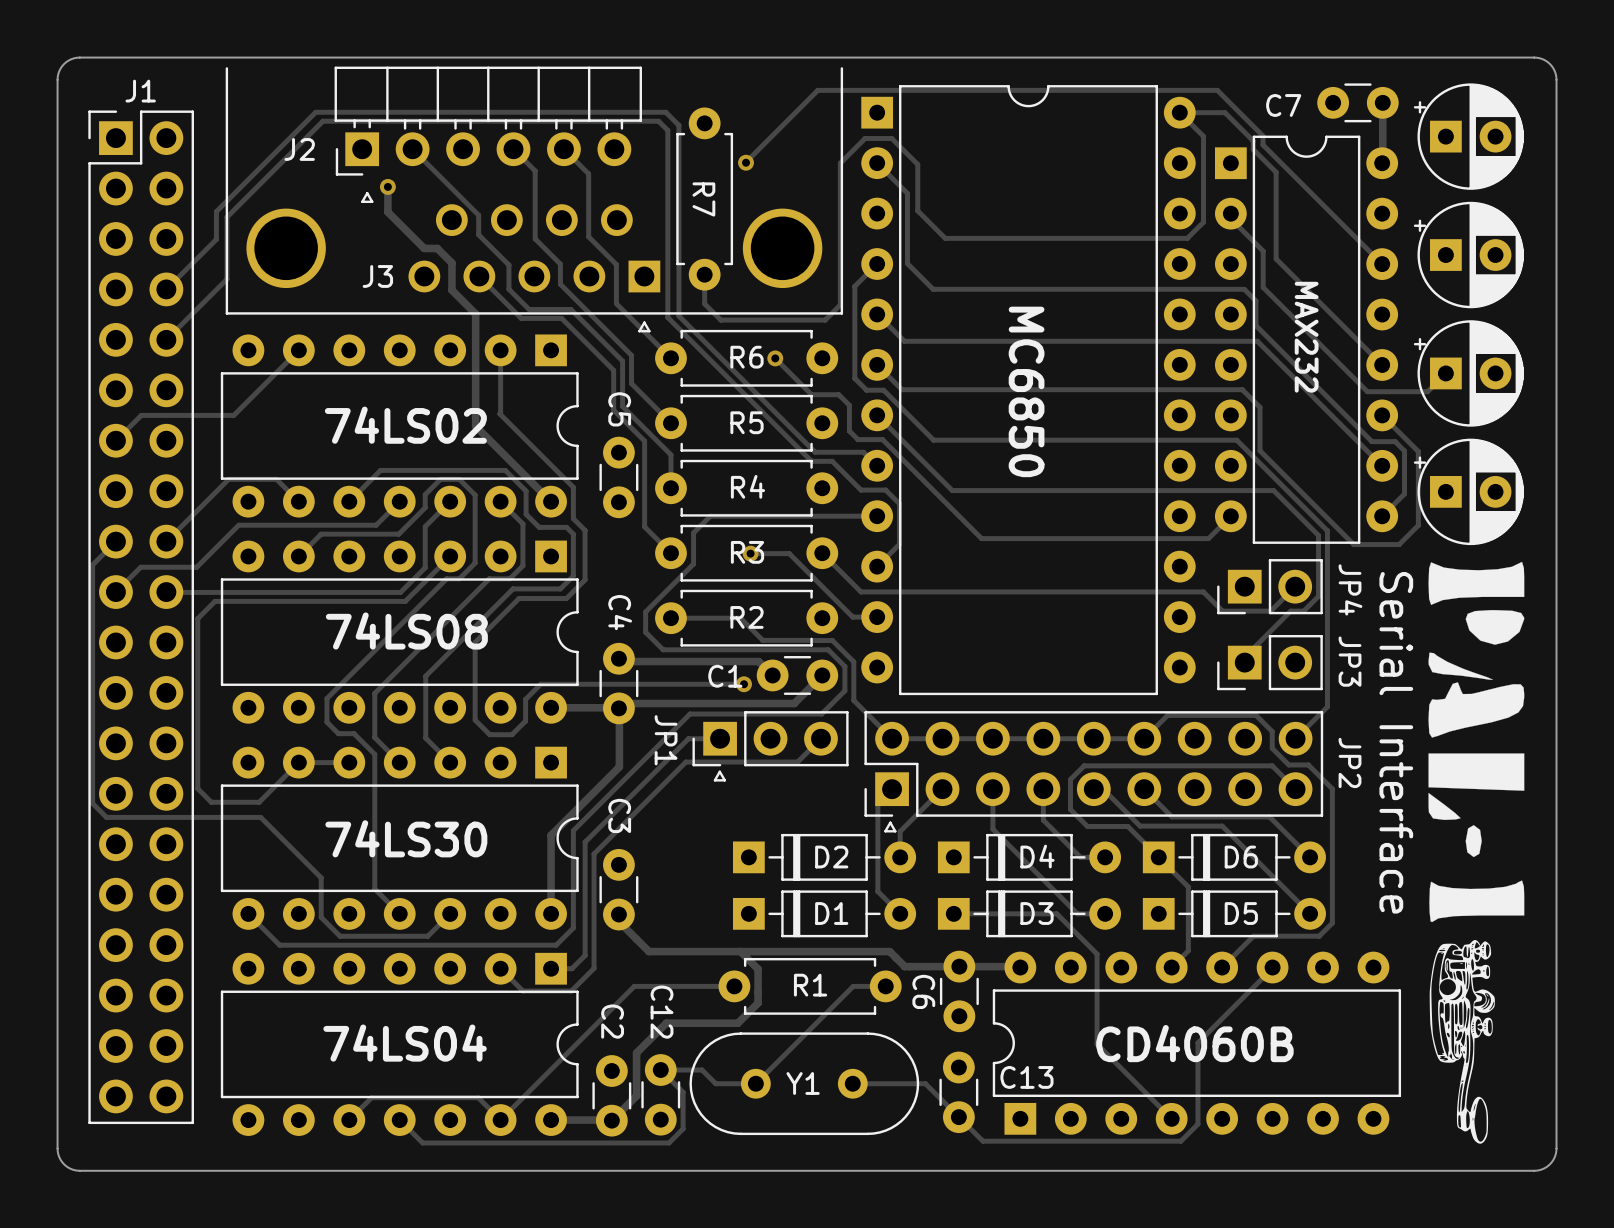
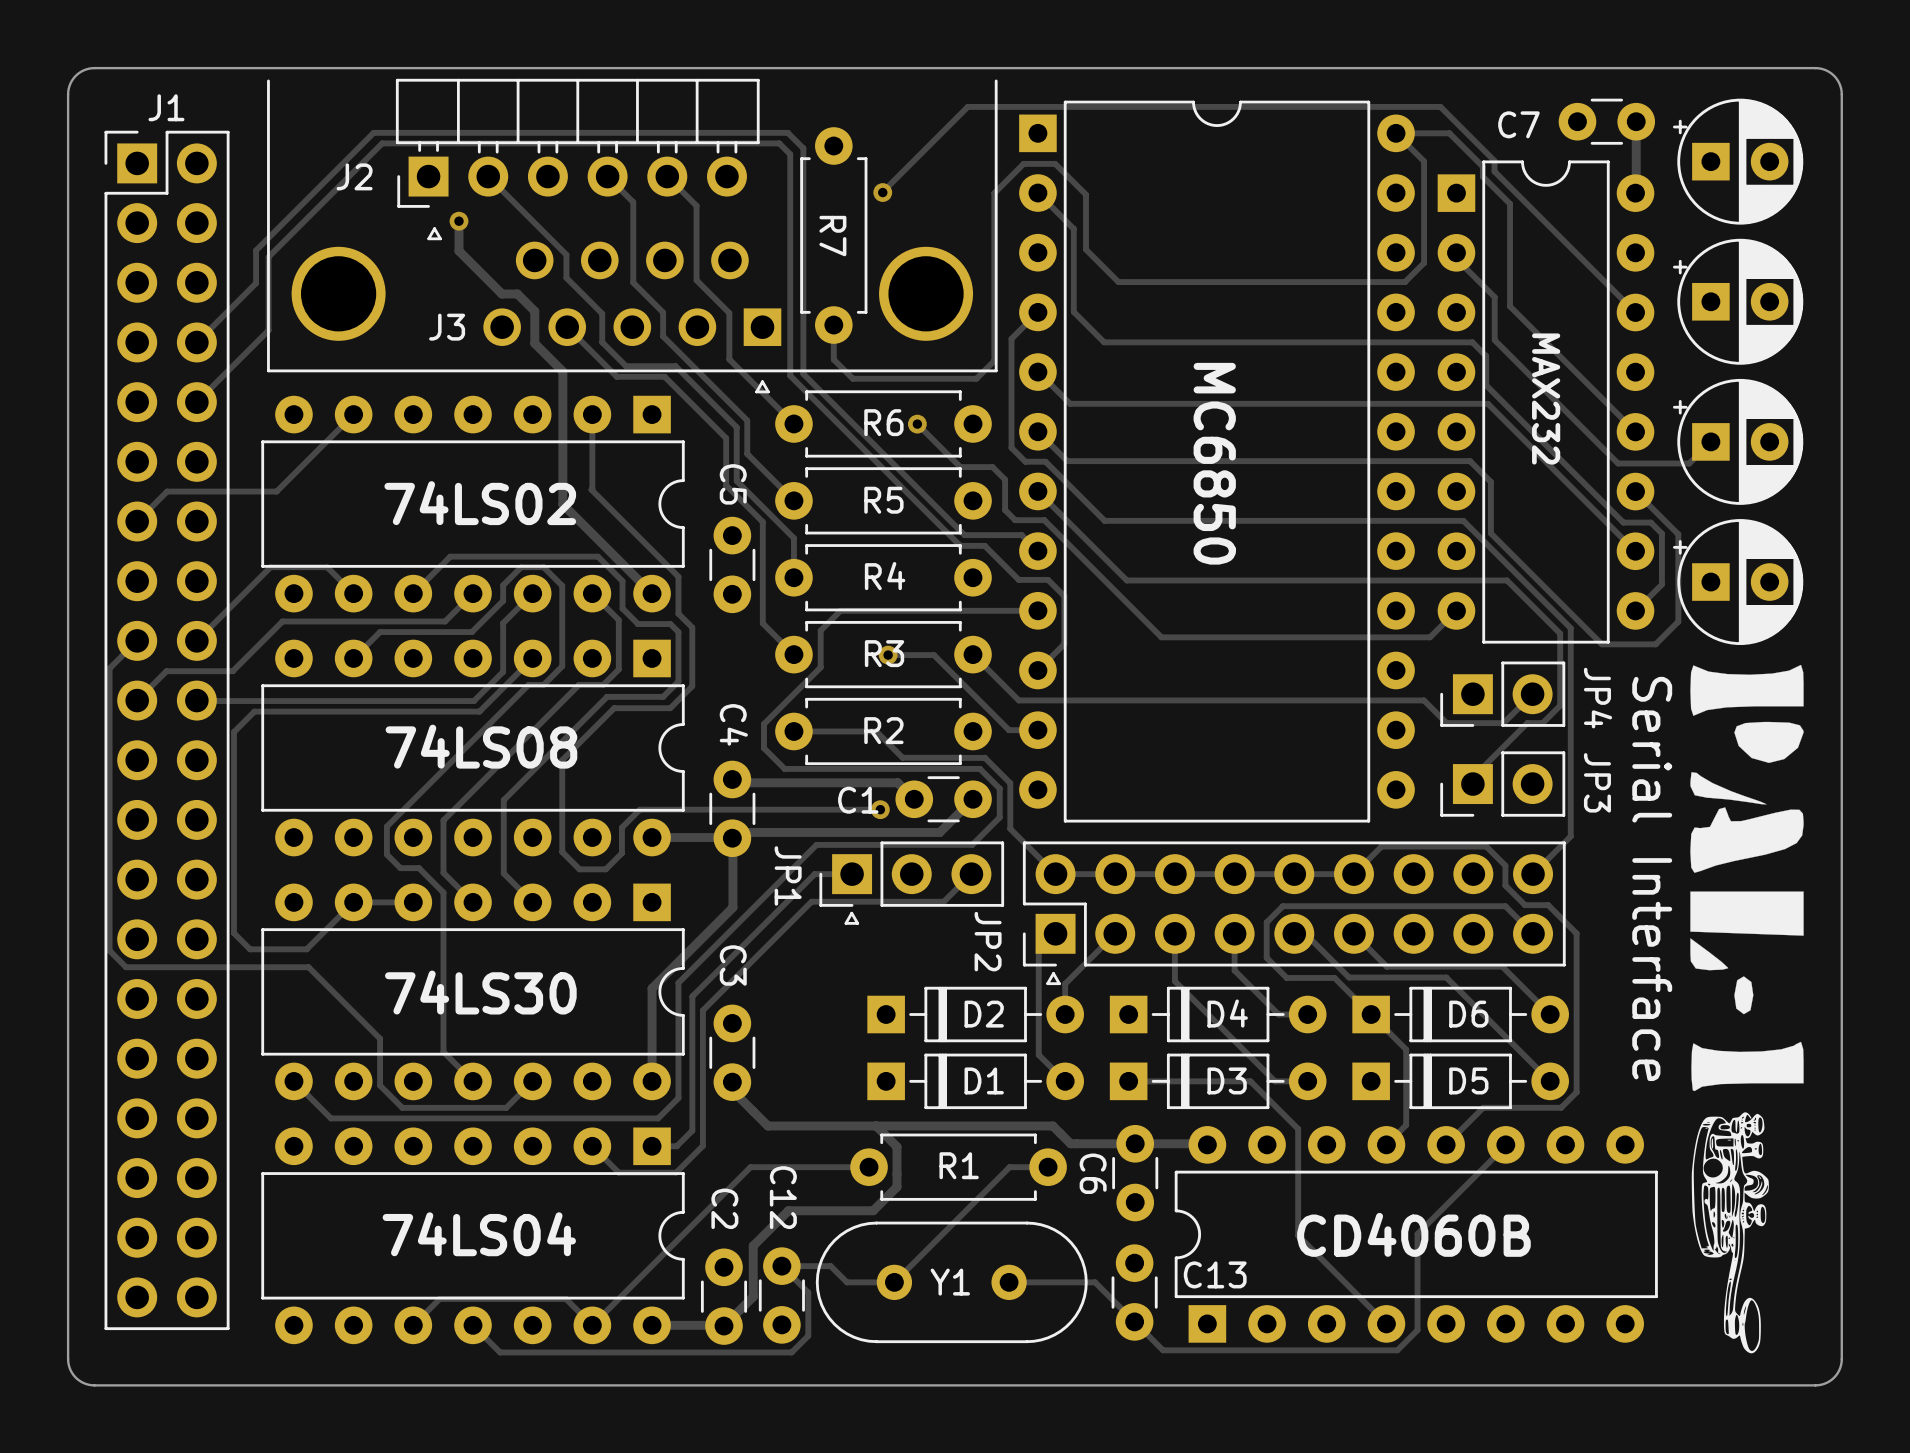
JP2 name position: JP2 (1350, 762) -> JP2 (988, 941)

